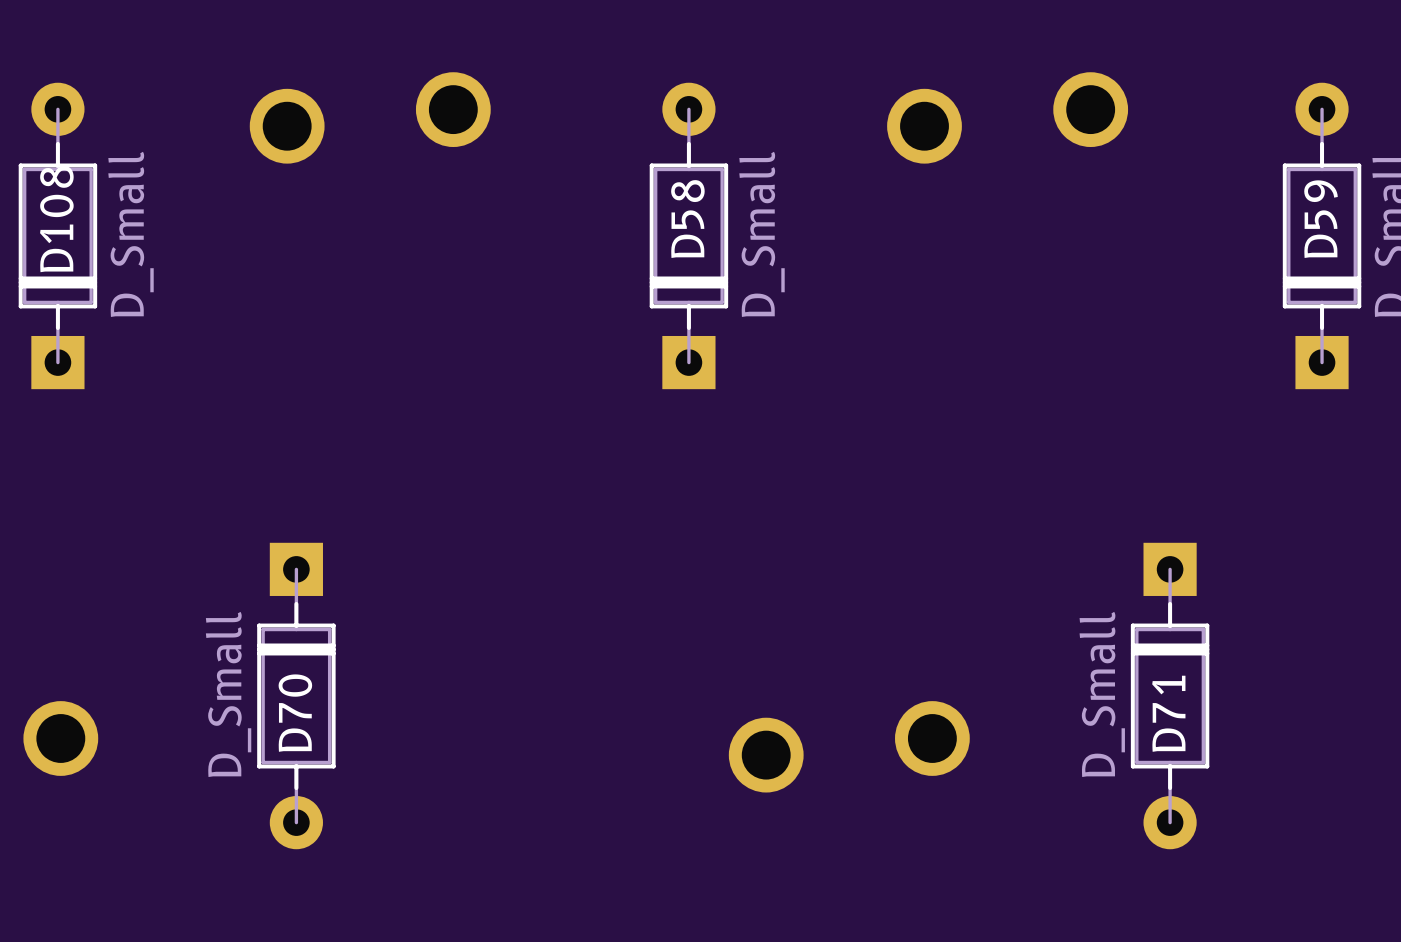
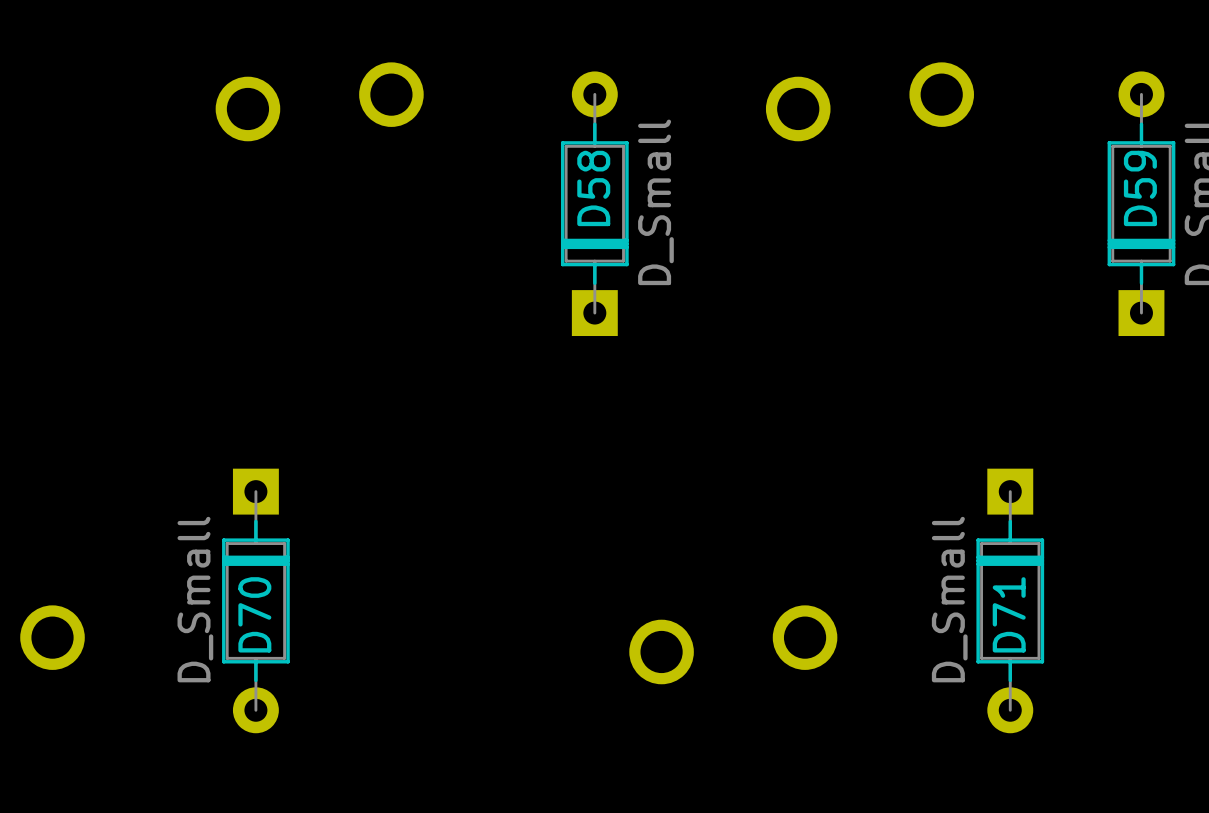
D108: D_Small (57, 235) -> none

